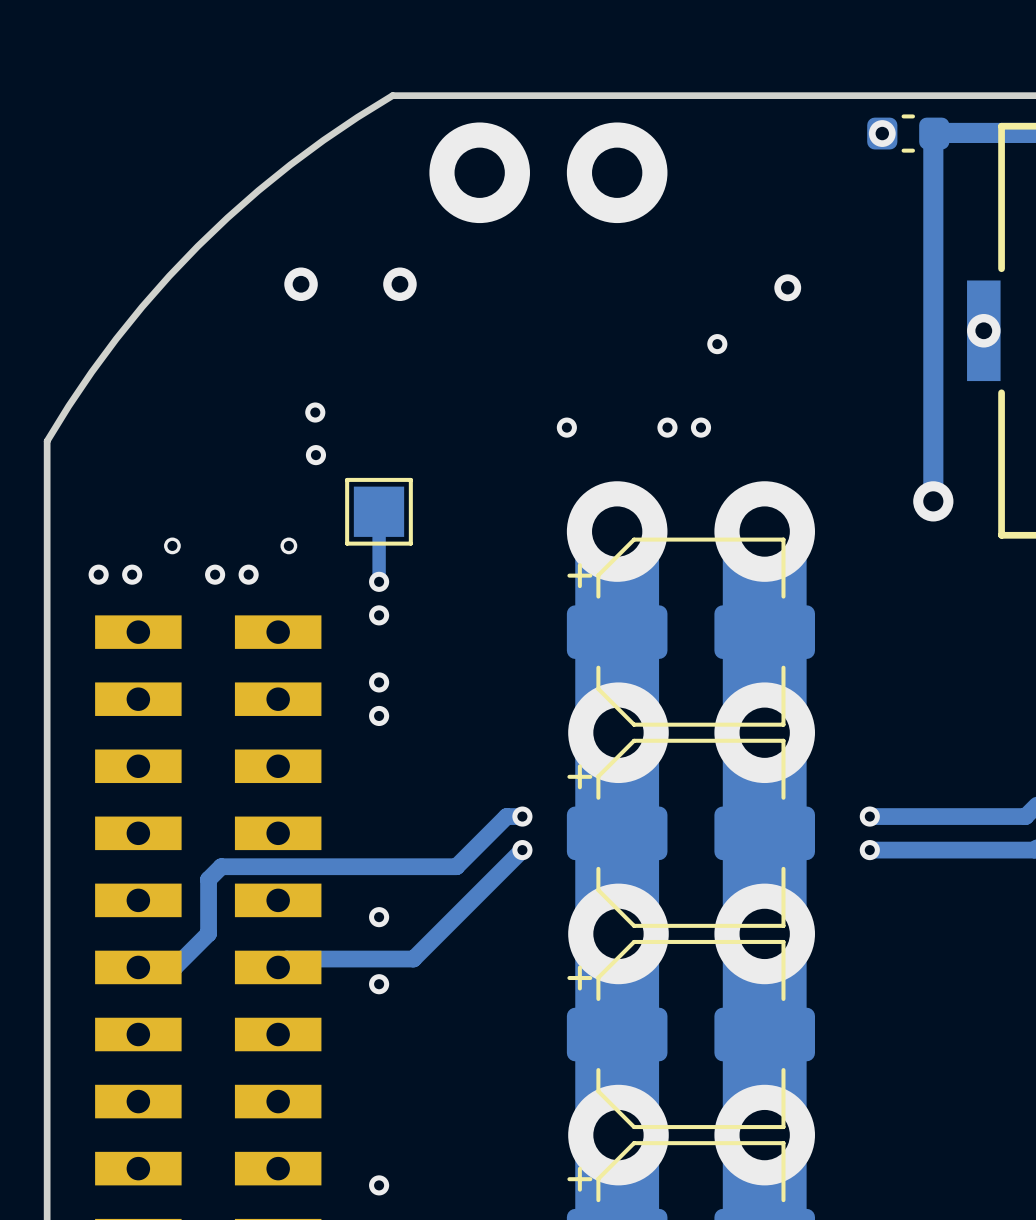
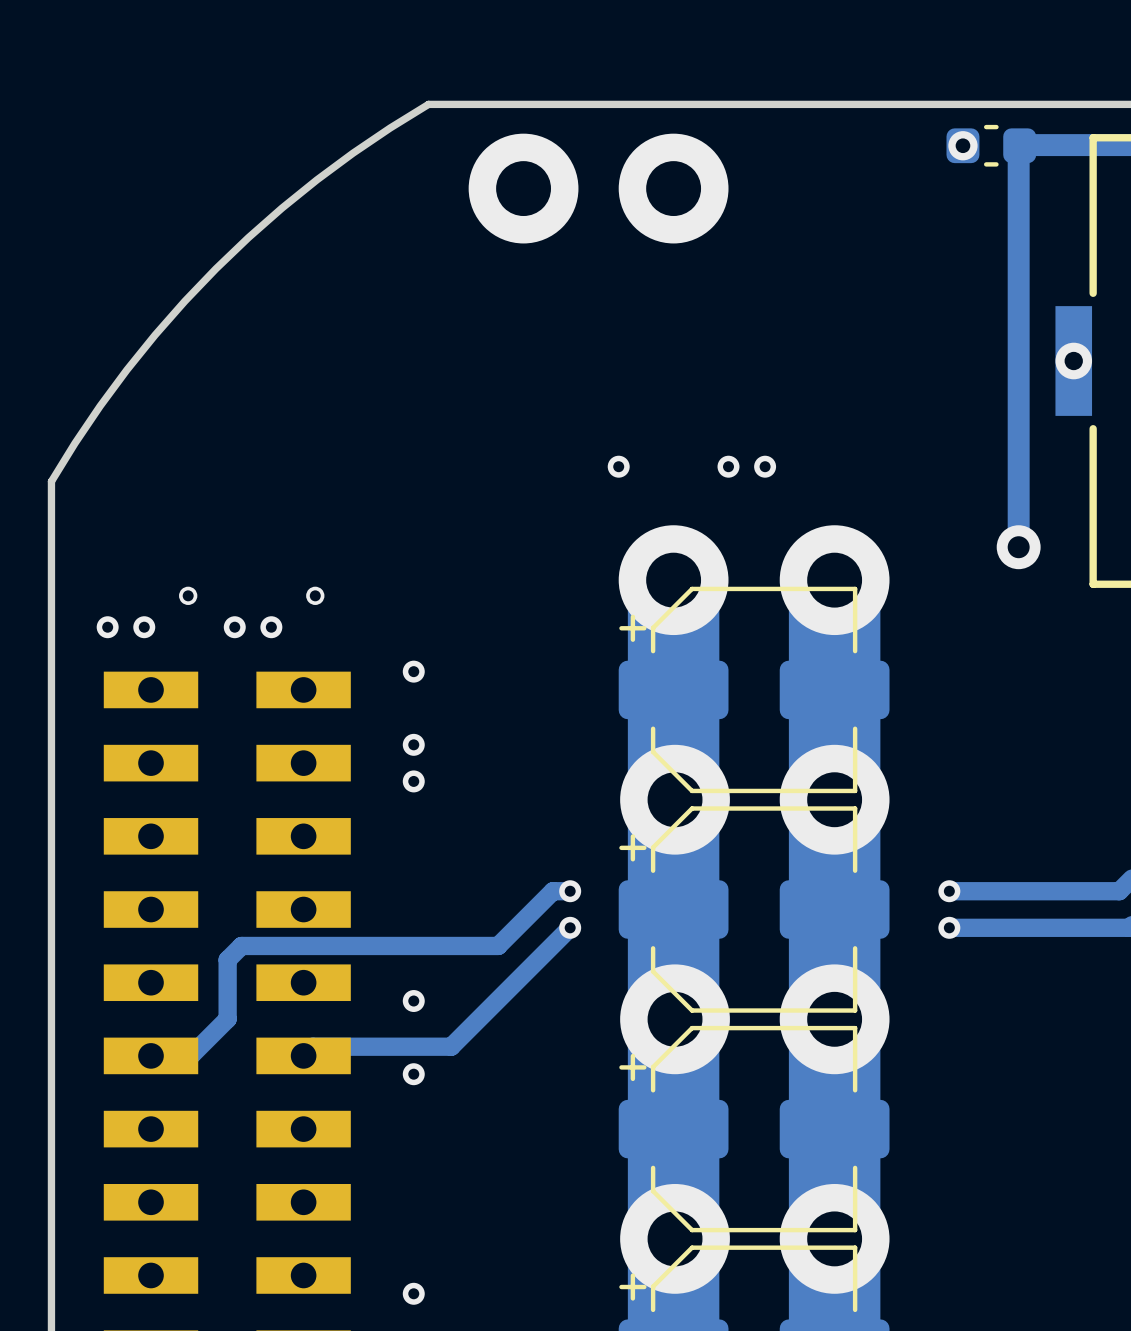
via: (301, 284) -> none
via: (399, 284) -> none
via: (787, 287) -> none
via: (717, 344) -> none
via: (315, 412) -> none
via: (315, 455) -> none
track: (379, 511) (379, 581) -> none
part: (379, 511) -> none
via: (379, 581) -> none

